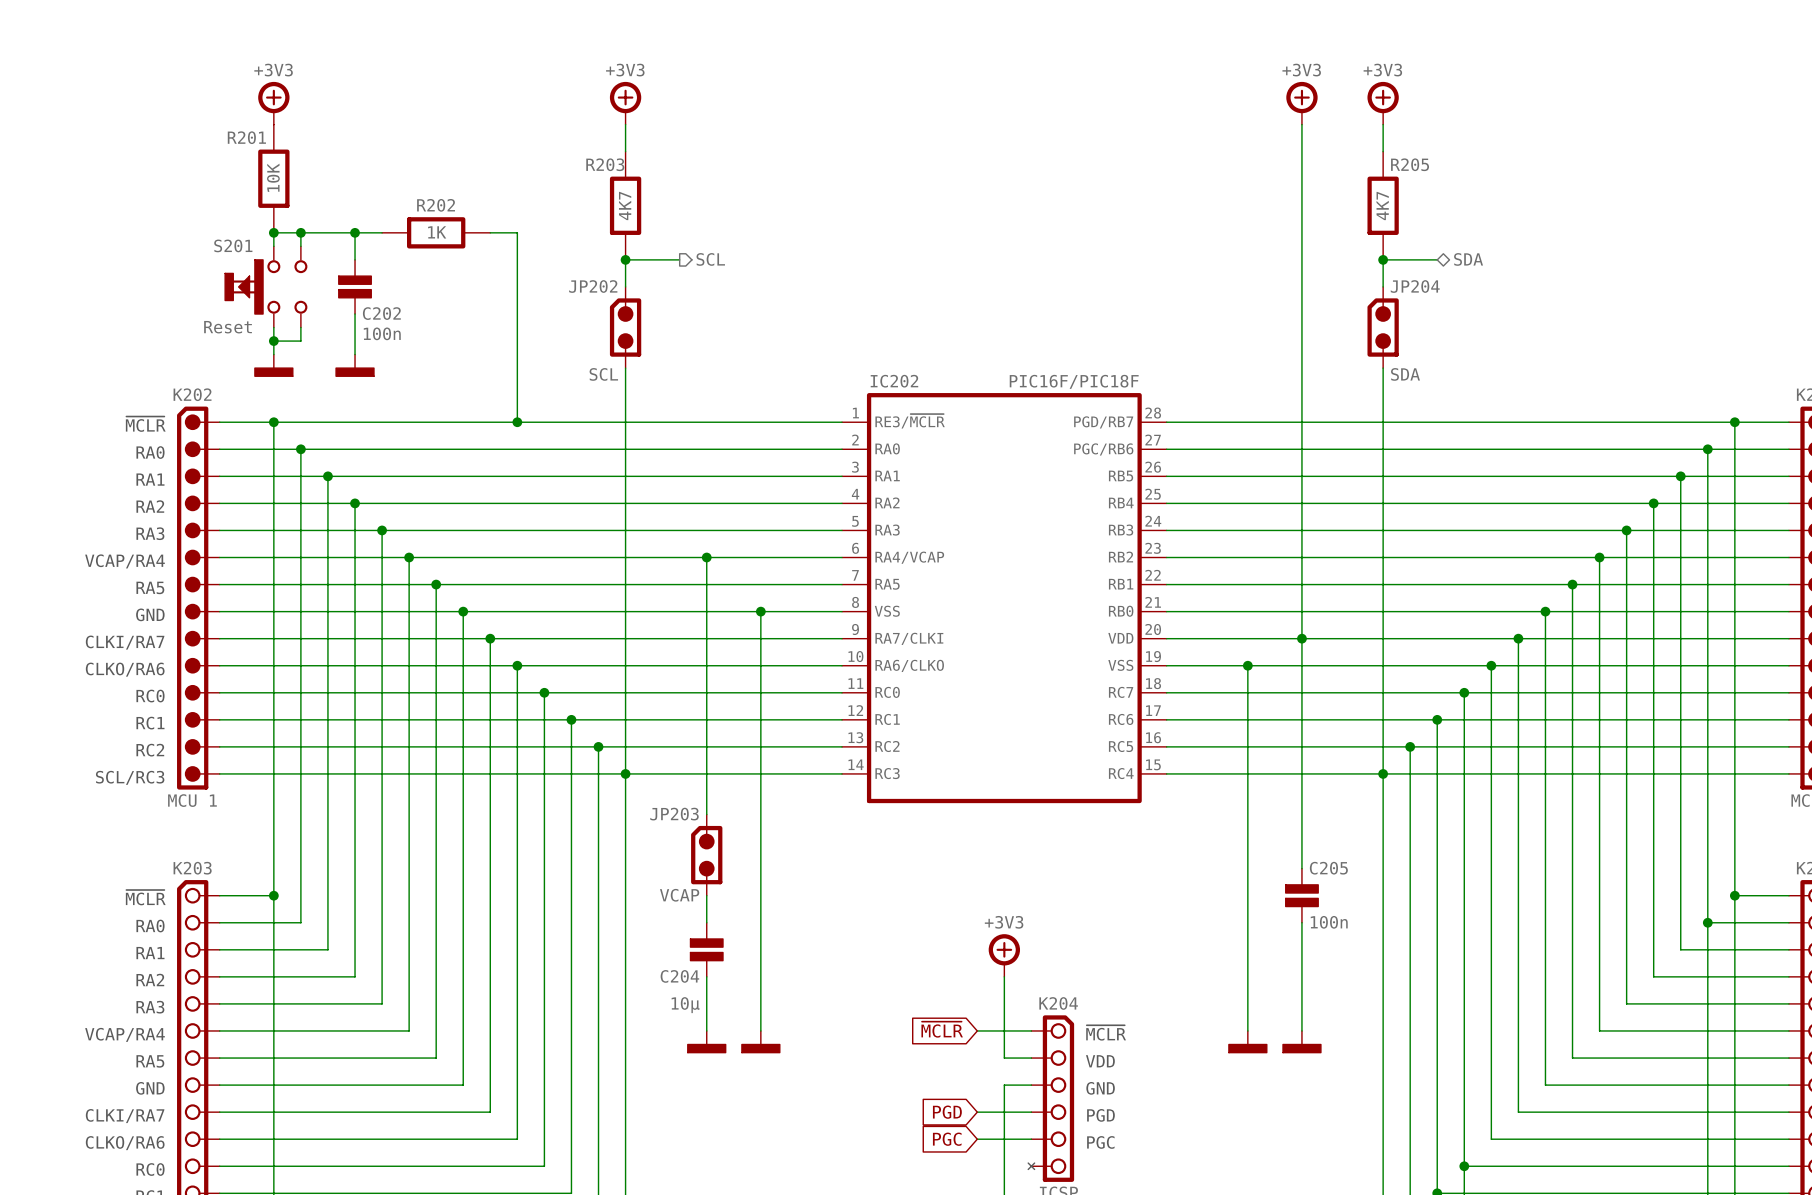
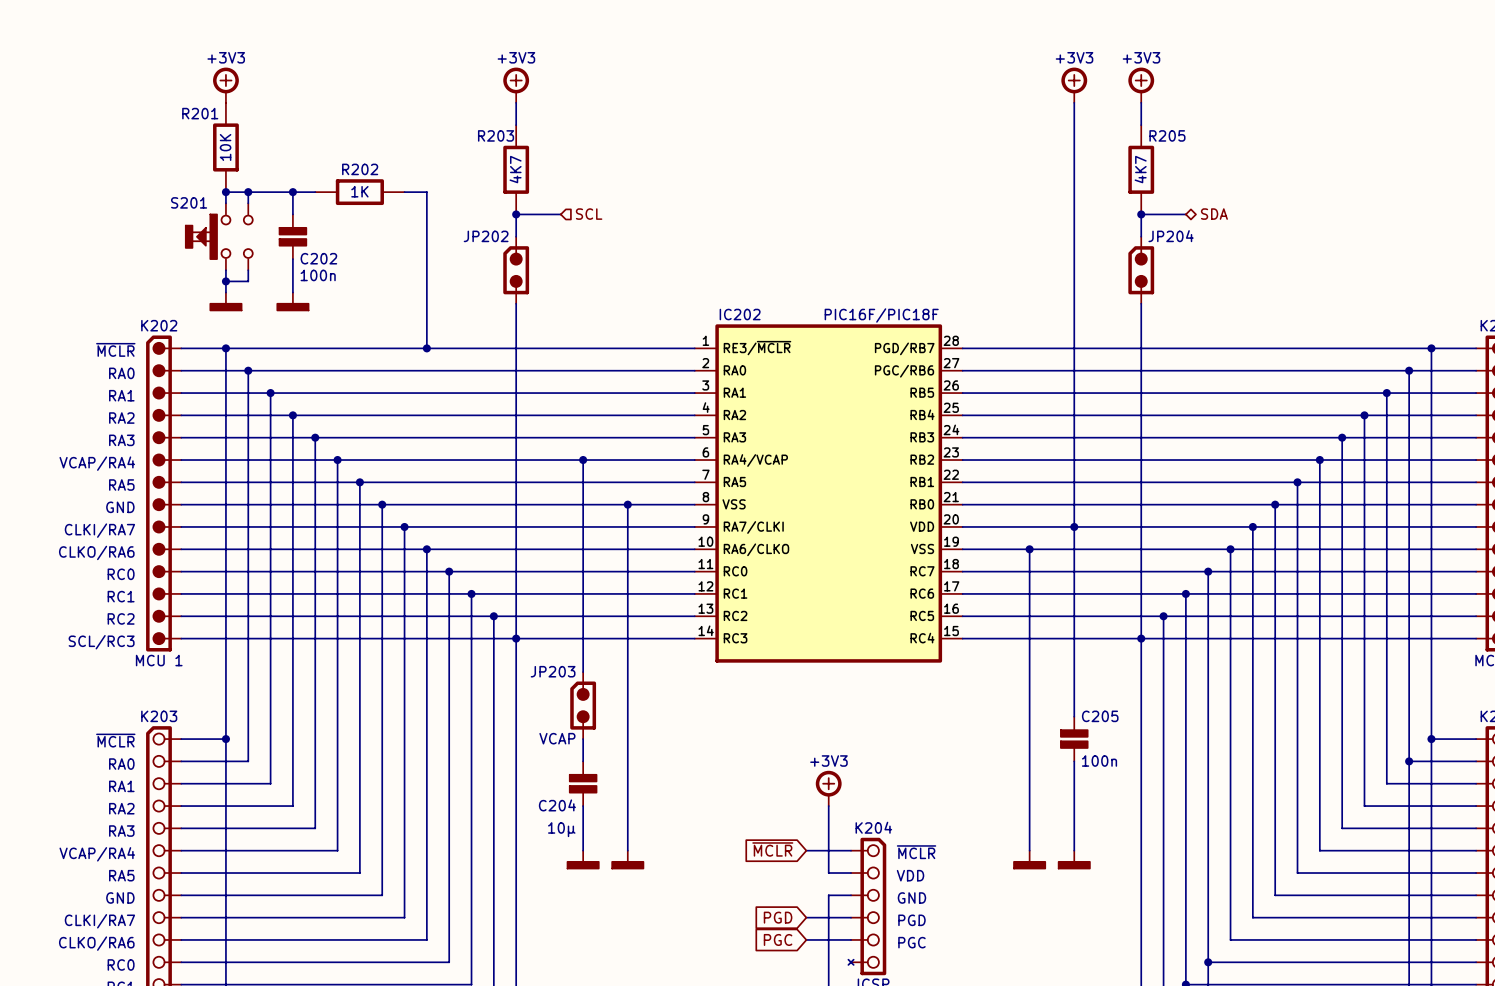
hierarchical label shape: output (710, 259) -> input (589, 214)
S201 value: Reset (228, 327) -> none
JP202 value: SCL (603, 374) -> none
JP204 value: SDA (1405, 374) -> none

